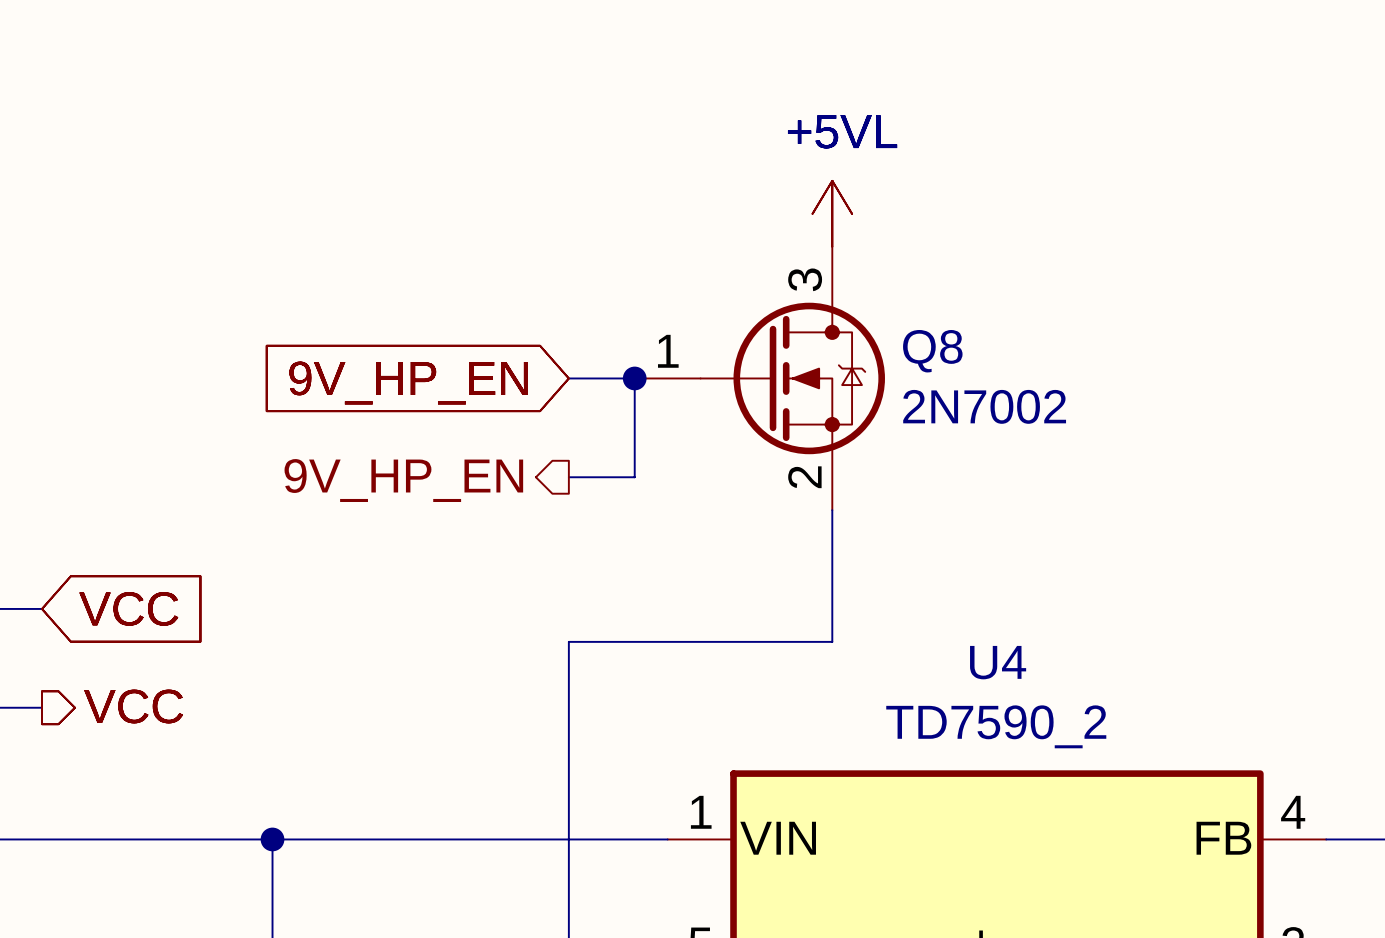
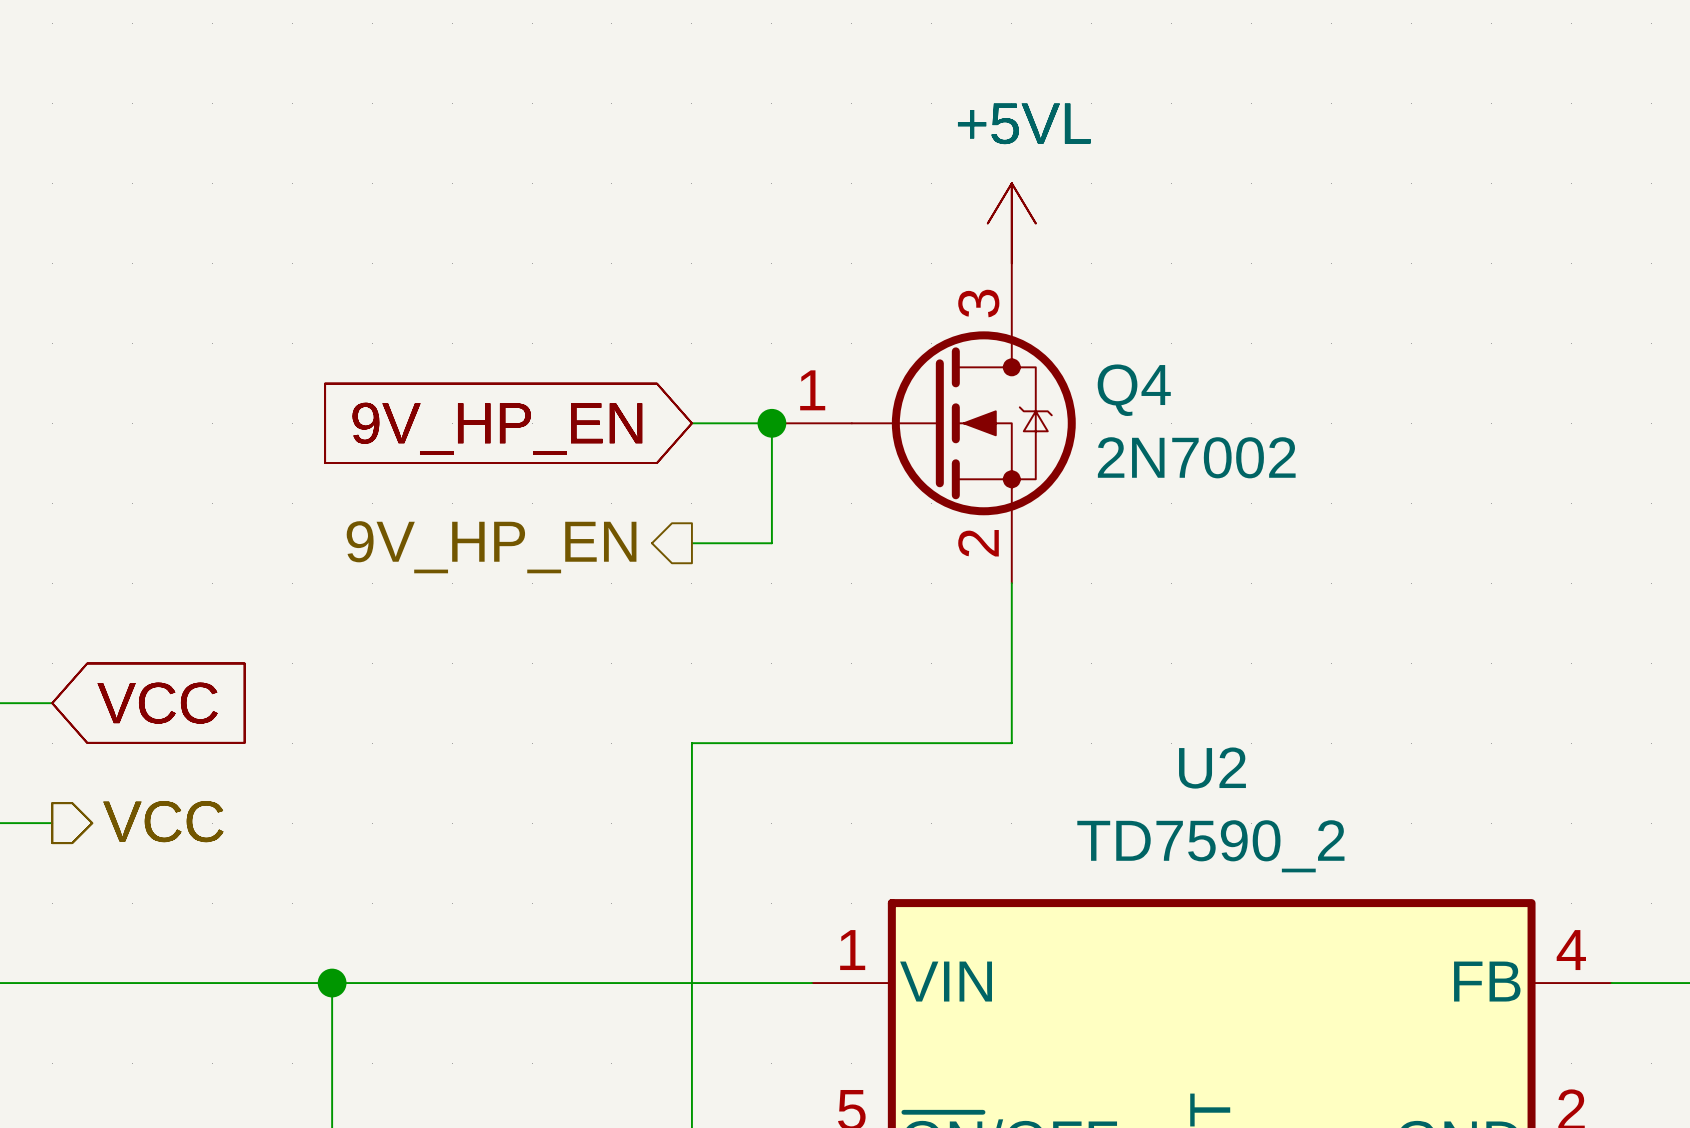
Q8 name: Q8 (932, 351) -> Q4 (1134, 390)
U4 name: U4 (998, 662) -> U2 (1212, 768)

